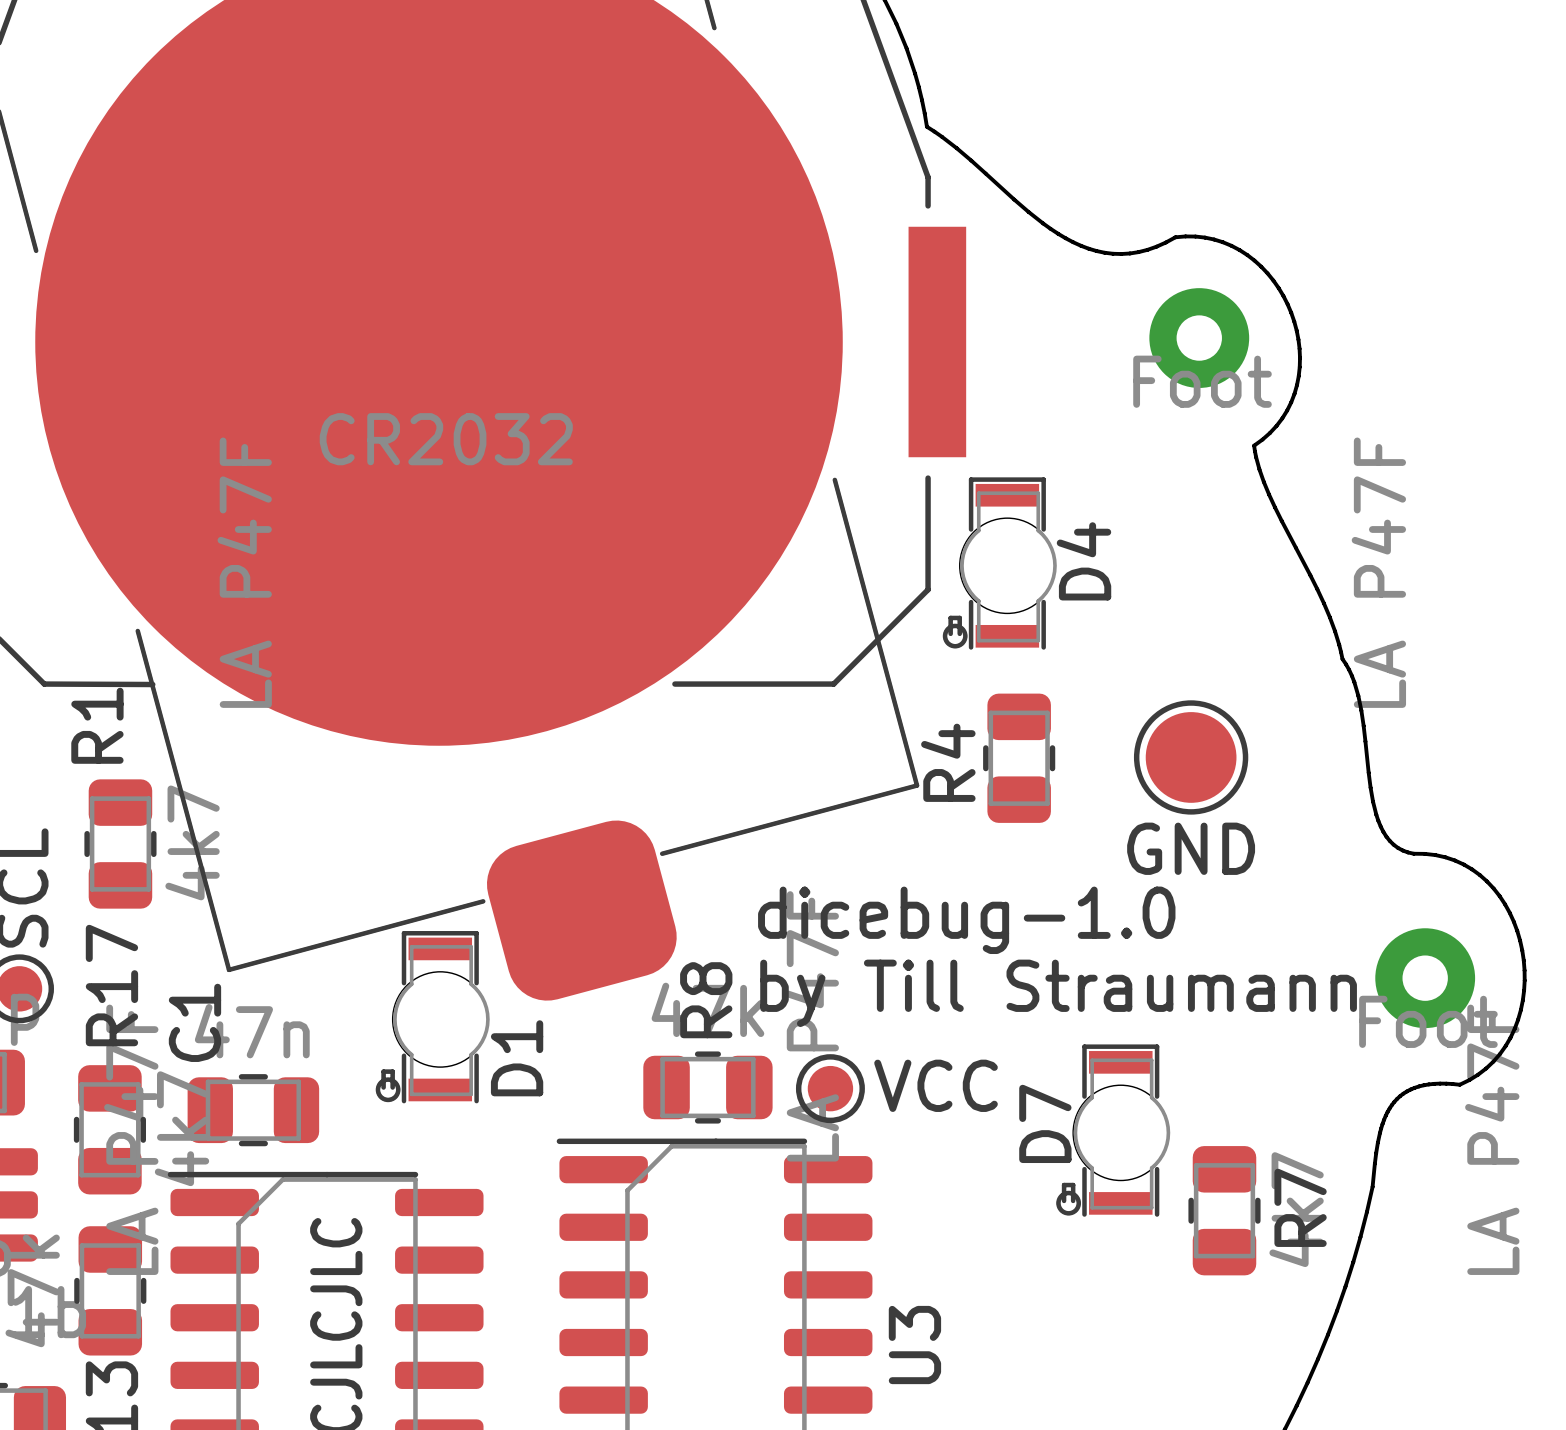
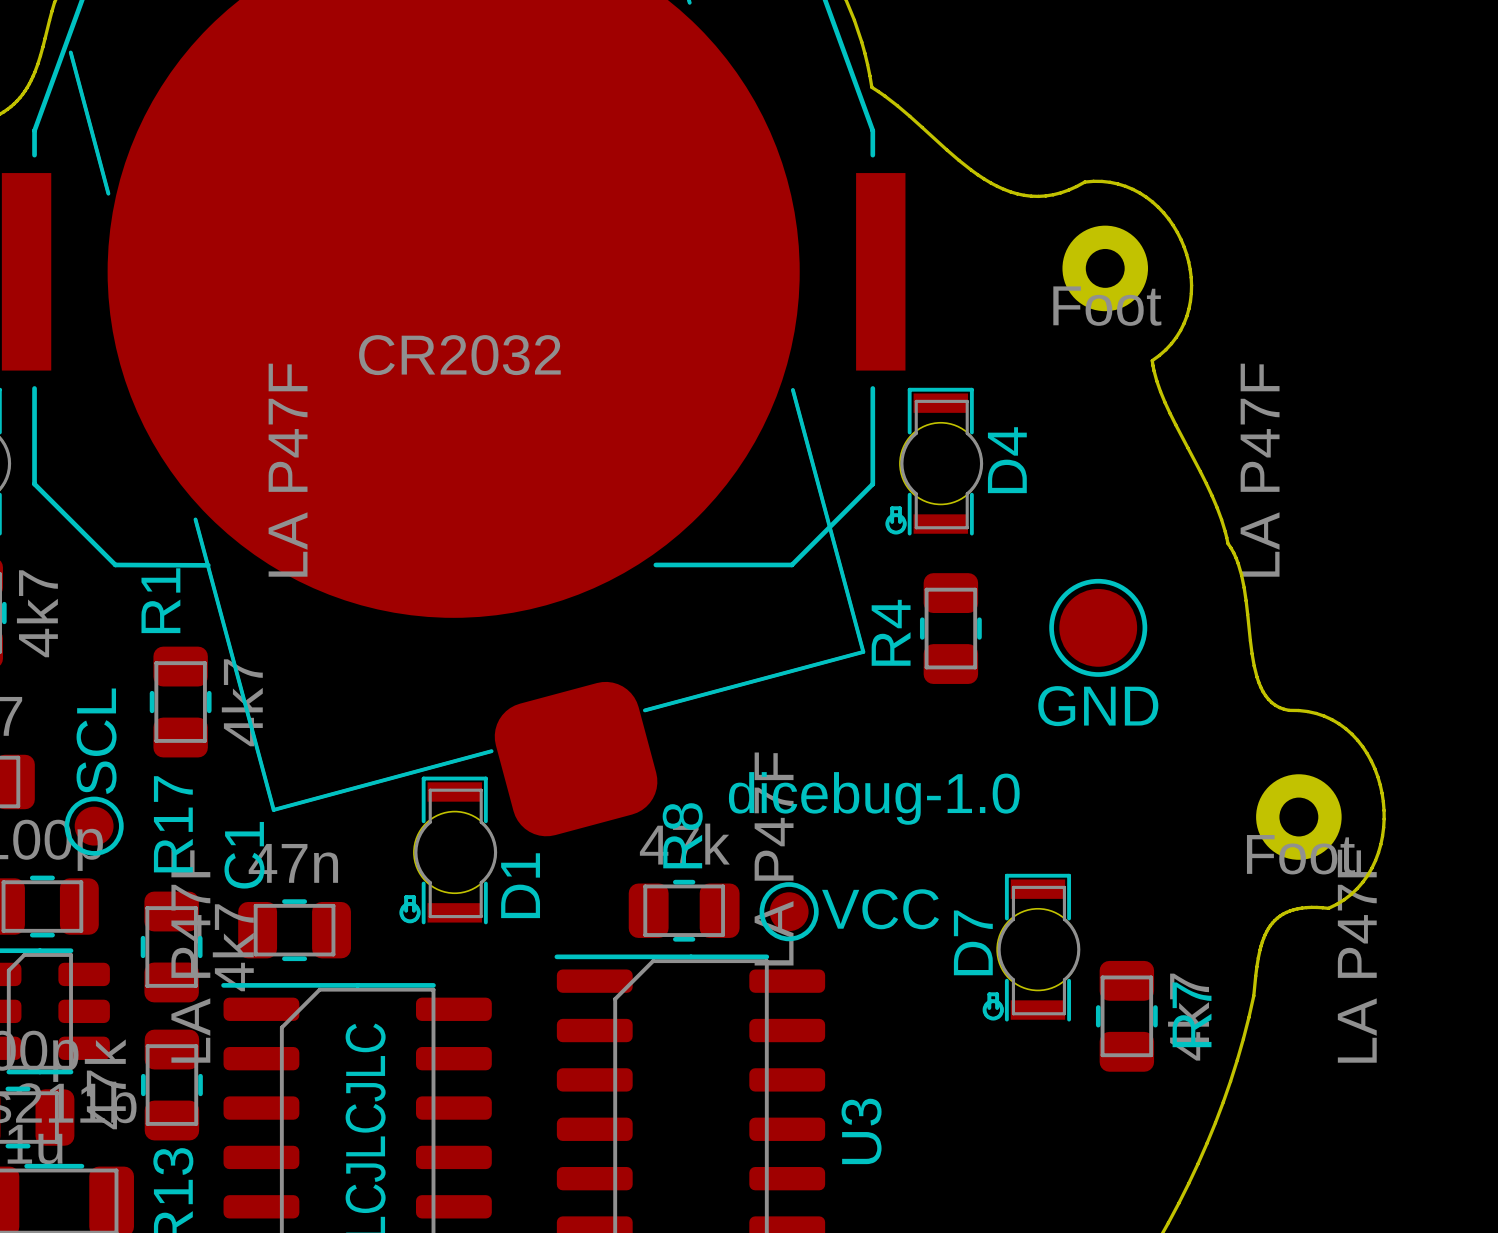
text position: dicebug-1.0 (966, 920) -> dicebug-1.0 (874, 798)
text: by Till Straumann (1058, 993) -> none

